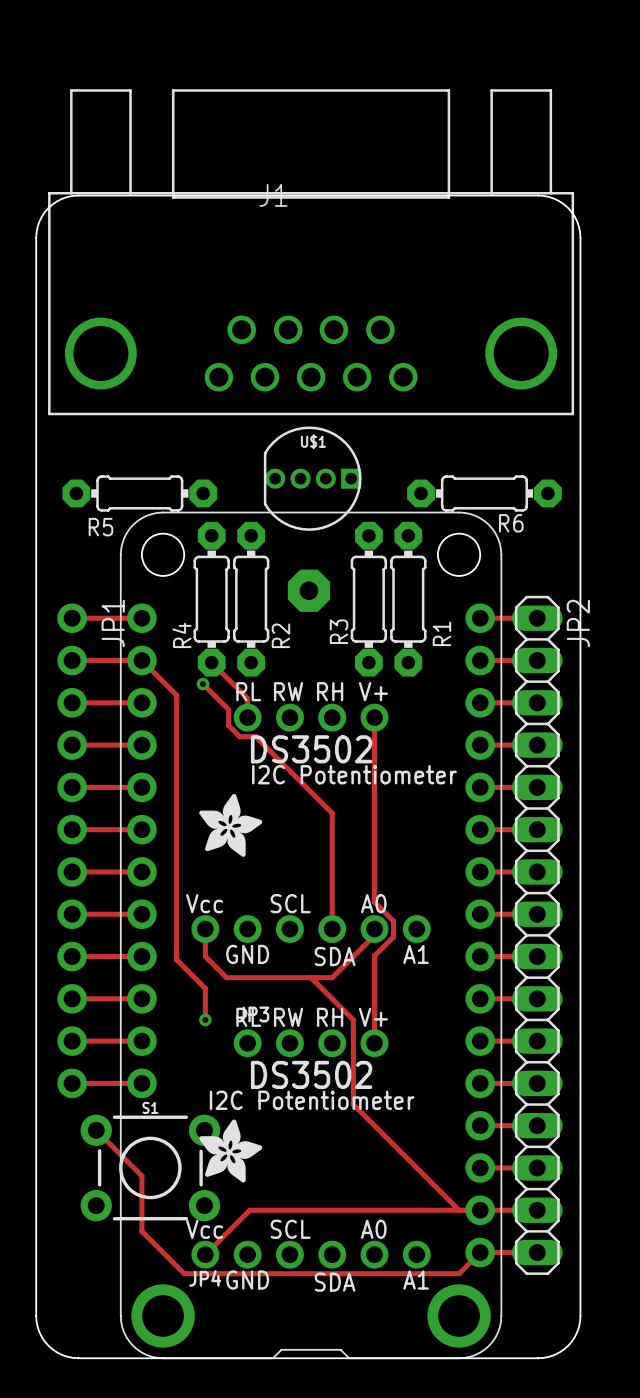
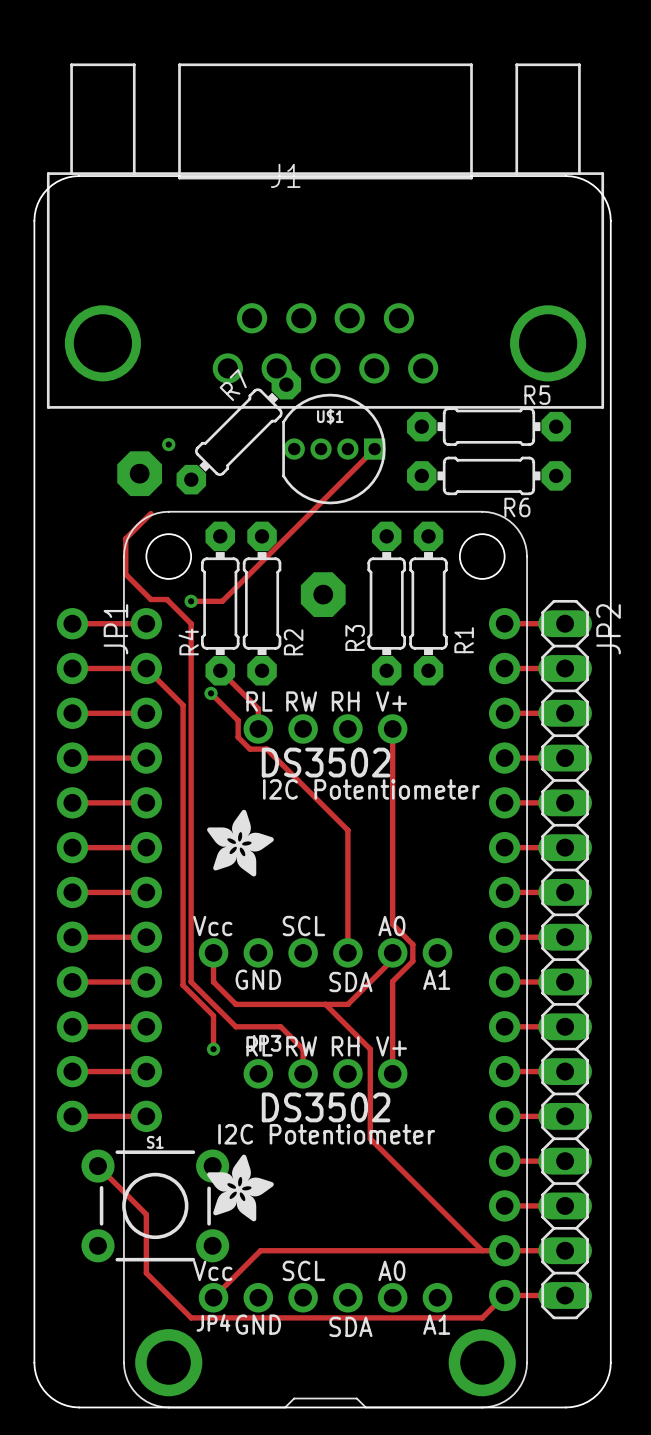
R7: none -> (238, 432)
U$1 name position: U$1 (313, 441) -> U$1 (330, 416)
via: none -> (168, 444)
track: none -> (374, 449) (222, 601) (191, 601)
part: none -> (139, 473)
U$1 position: (312, 478) -> (333, 449)
R5 position: (139, 493) -> (488, 426)
R6 position: (484, 493) -> (488, 475)
track: none -> (150, 513) (125, 538) (125, 574) (150, 599) (166, 599) (191, 623) (191, 982) (235, 1026) (280, 1026) (303, 1049) (303, 1073)
R5 name position: R5 (100, 527) -> R5 (537, 395)
via: none -> (191, 601)

